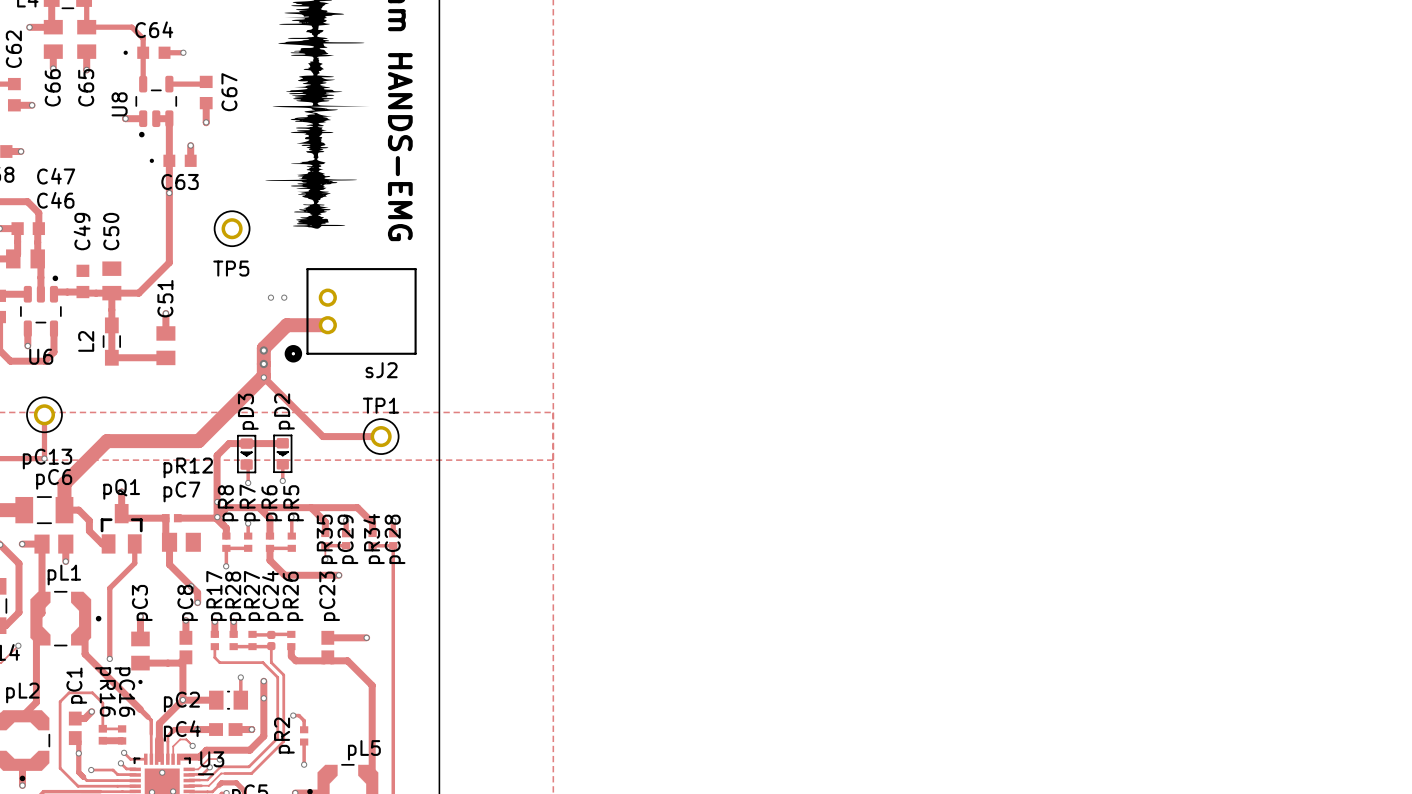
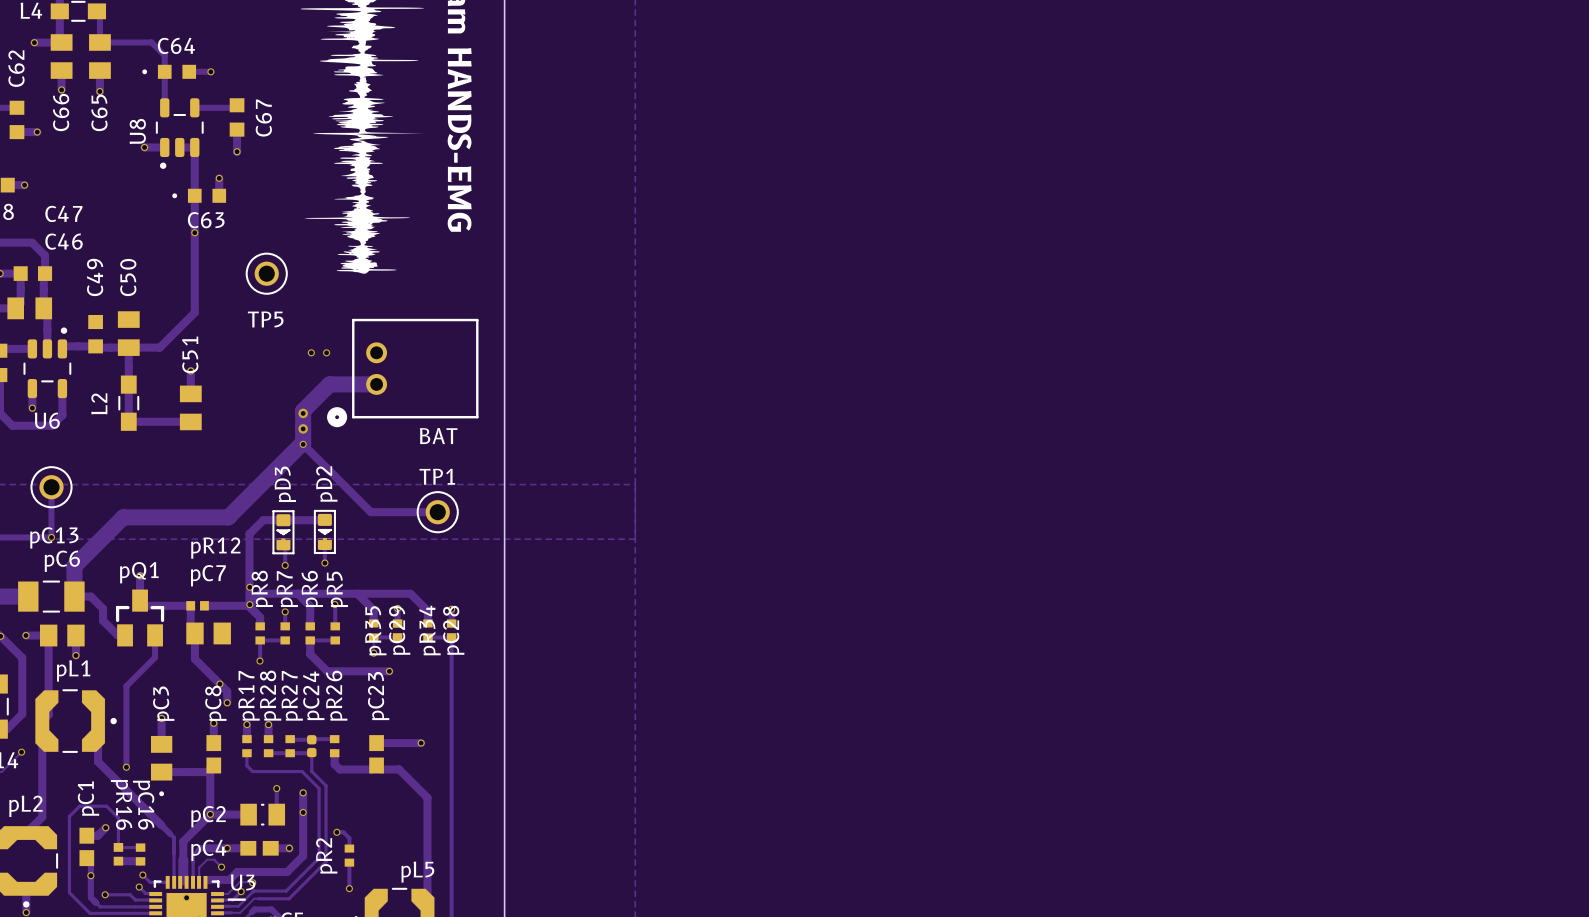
sJ2 name: sJ2 (381, 370) -> BAT (438, 436)

